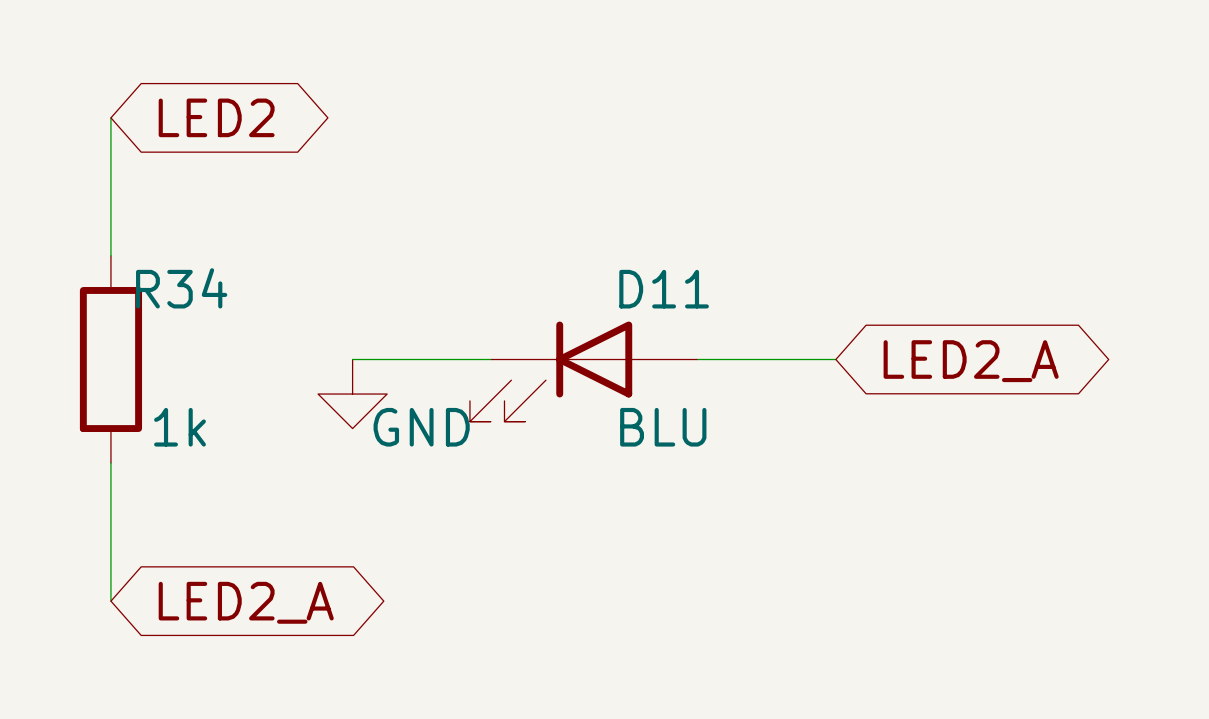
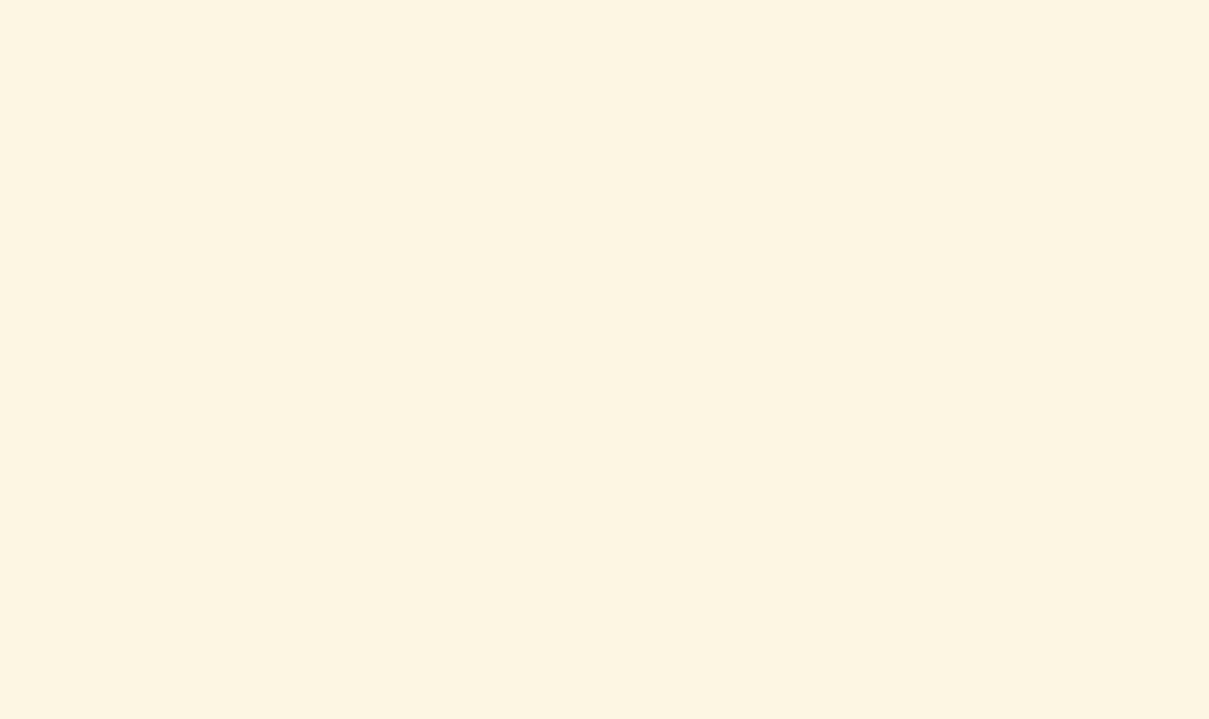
wire: (110, 117) (110, 255) -> none
global label: LED2 (216, 117) -> none
R34: 1k (110, 359) -> none
wire: (352, 359) (490, 359) -> none
wire: (697, 359) (835, 359) -> none
global label: LED2_A (971, 361) -> none
D11: BLU (583, 371) -> none
power symbol: GND (352, 394) -> none
wire: (110, 463) (110, 601) -> none
global label: LED2_A (246, 602) -> none

